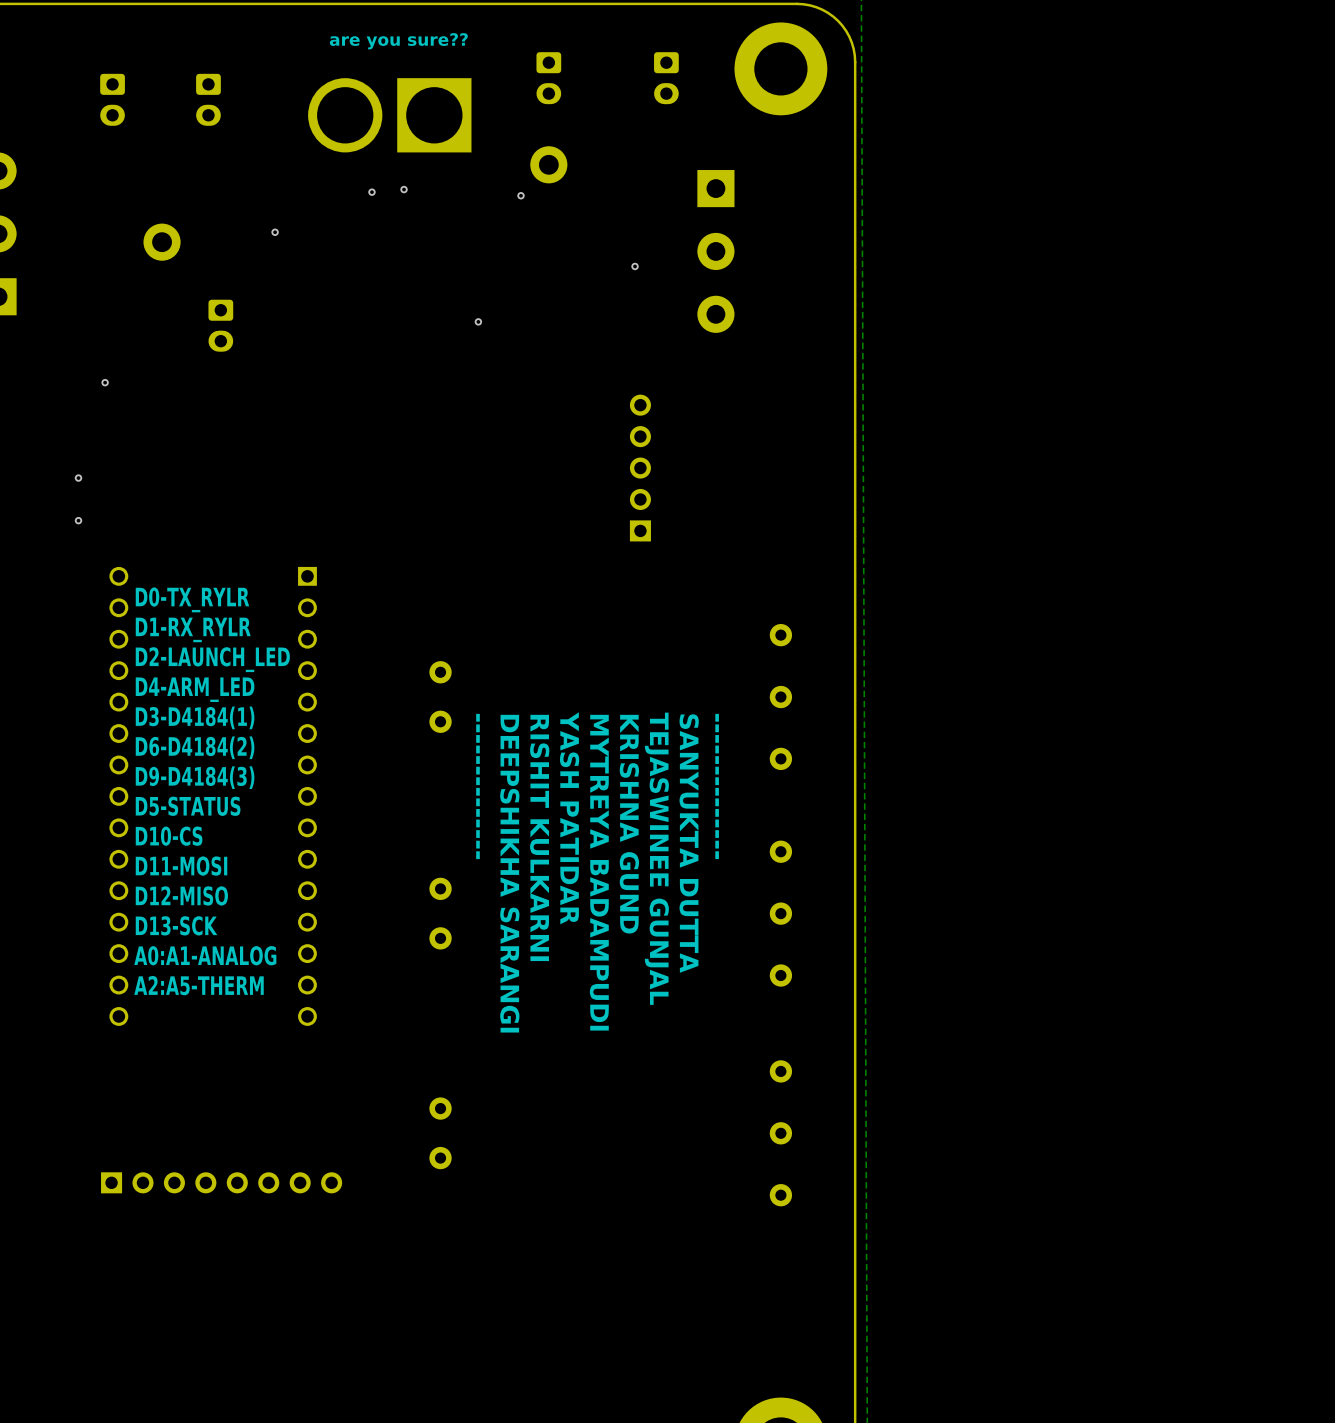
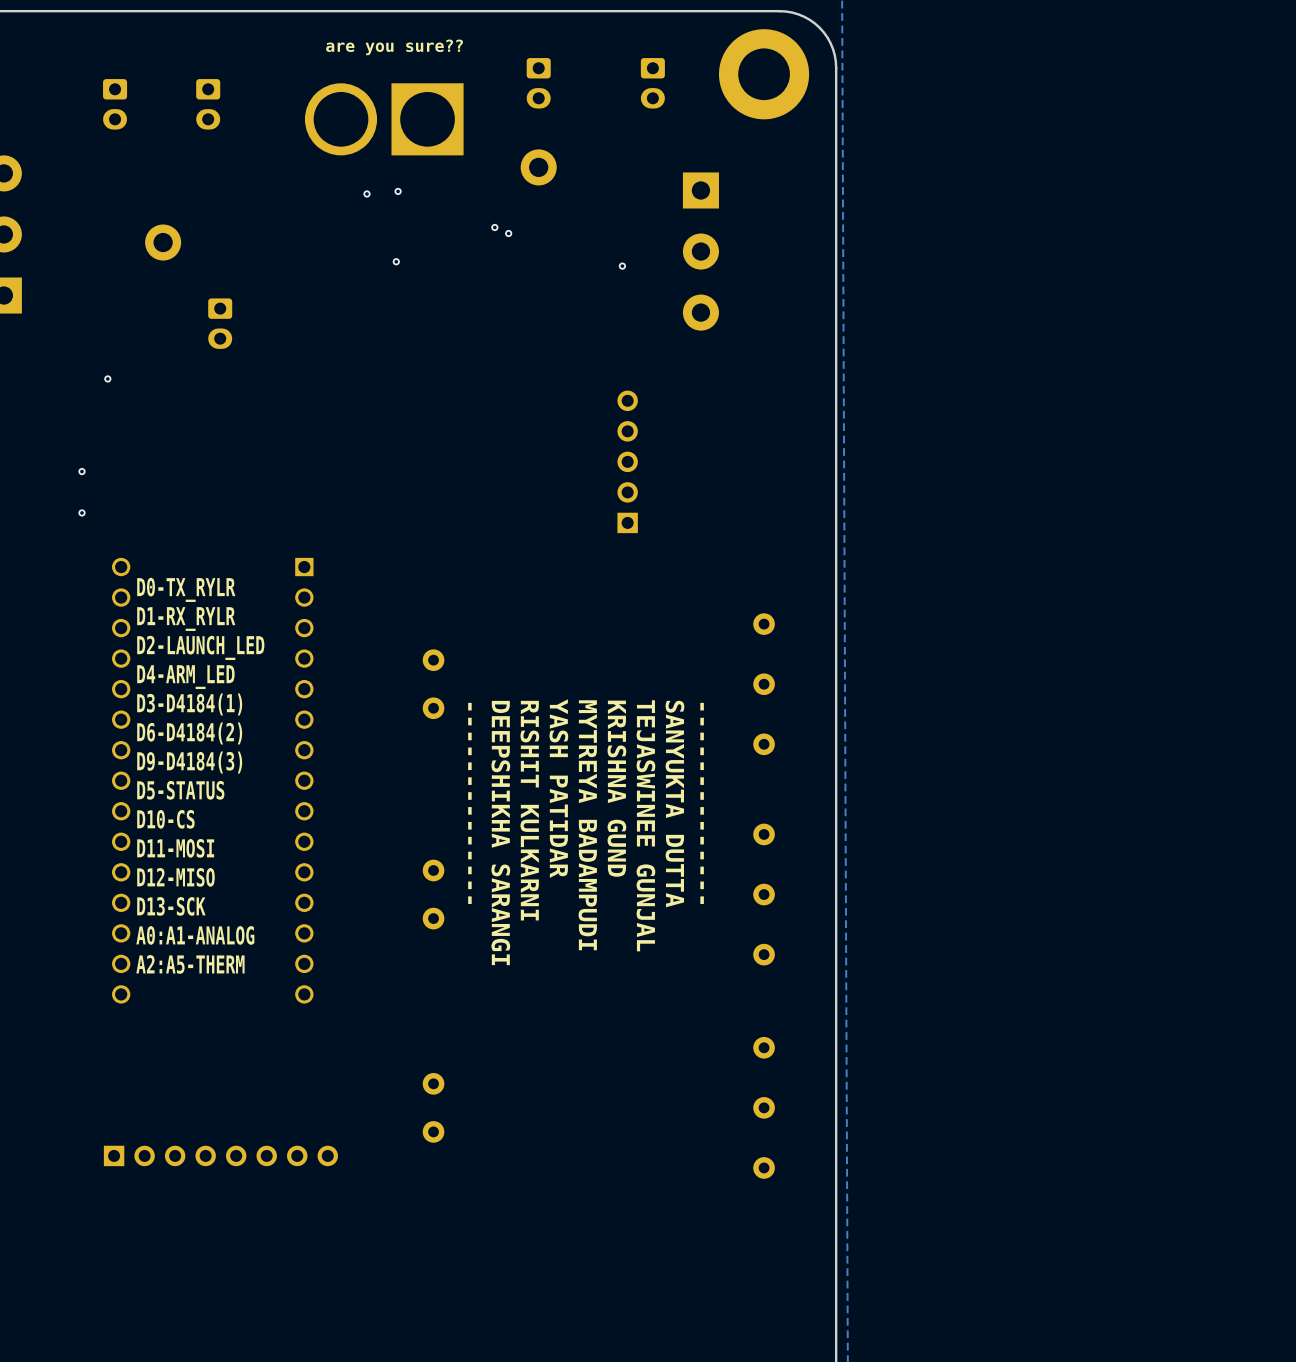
via: (520, 195) -> none
via: none -> (494, 227)
via: (275, 232) -> none
via: none -> (508, 233)
via: none -> (396, 261)
via: (478, 321) -> none

